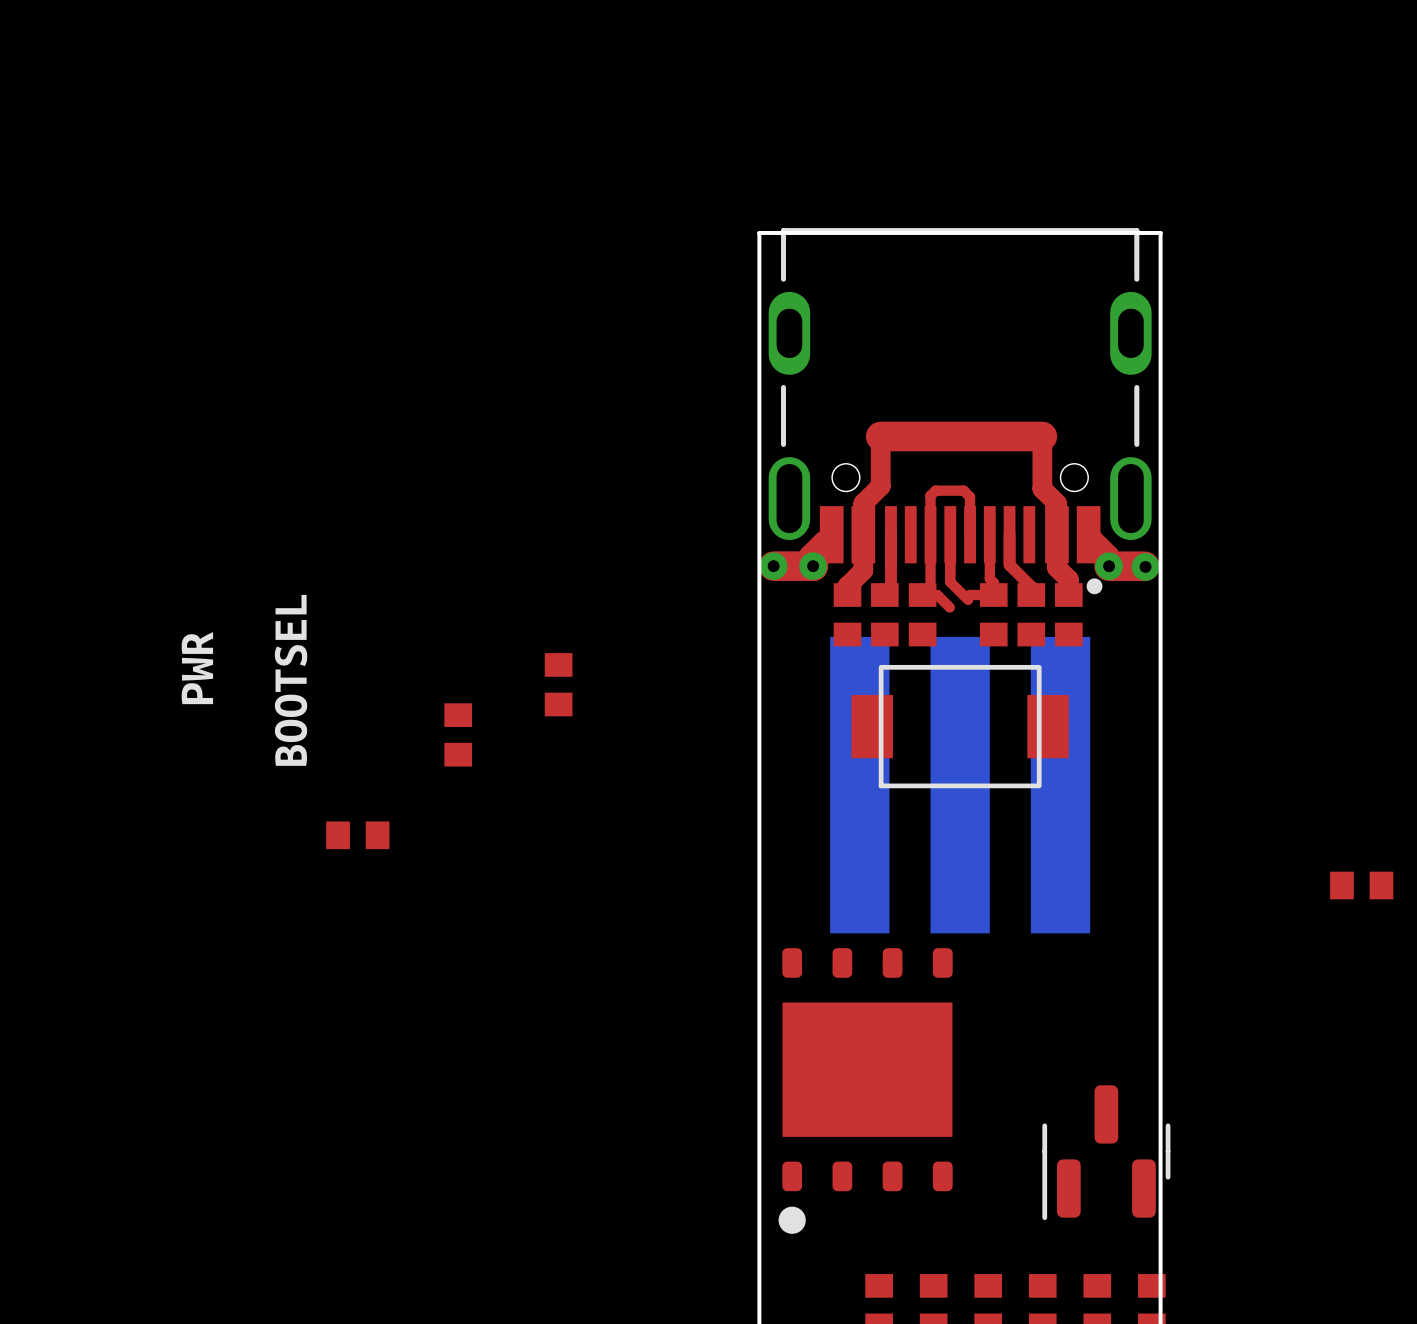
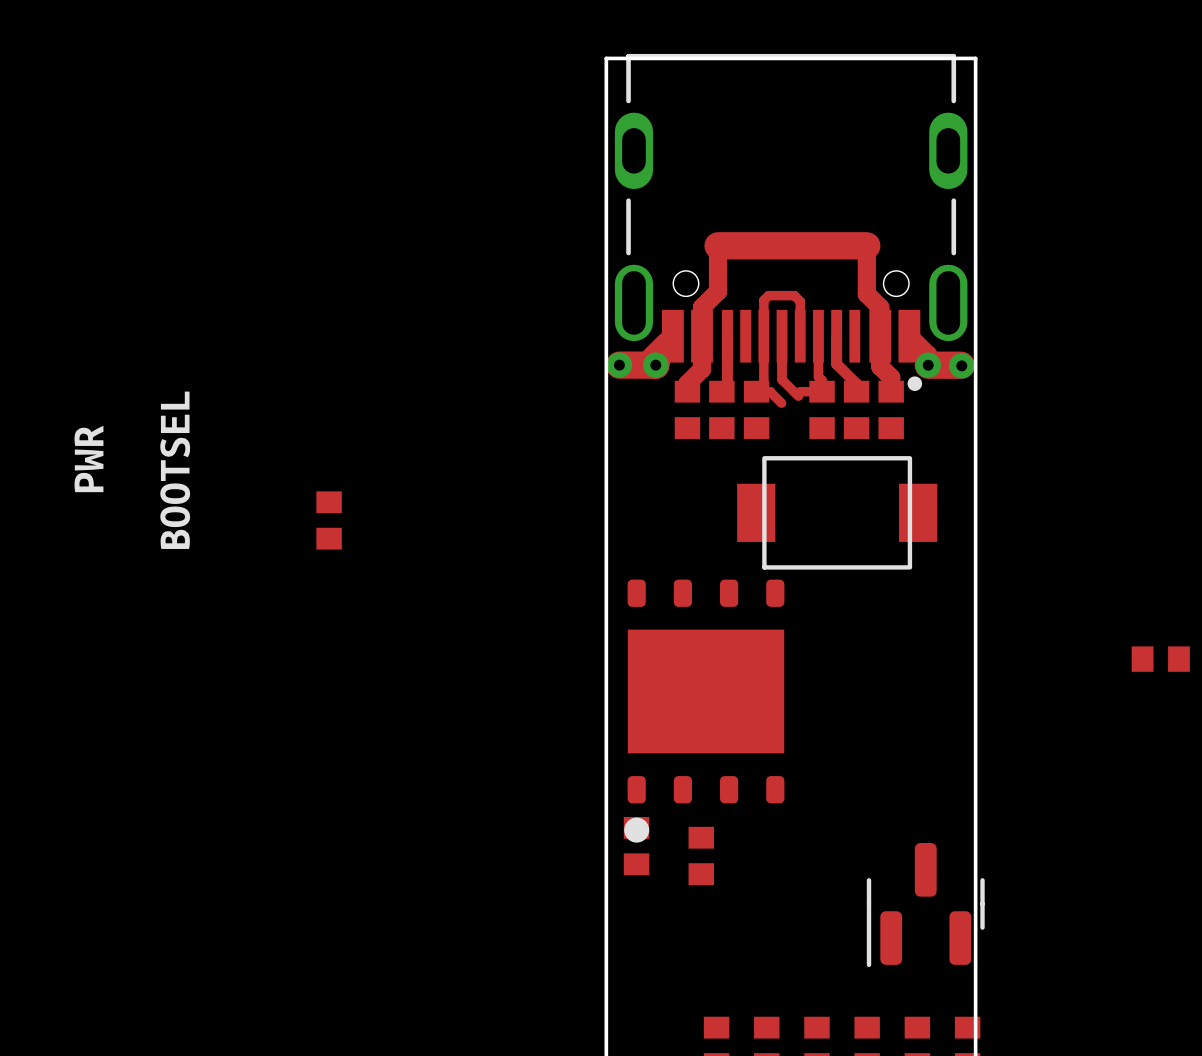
part: (558, 684) -> none
part position: (960, 726) -> (837, 512)
part: (960, 785) -> none
part: (357, 835) -> none
part: none -> (704, 711)
part footprint: [778, 948, 953, 1234] -> [688, 826, 715, 886]
part: none -> (636, 846)

